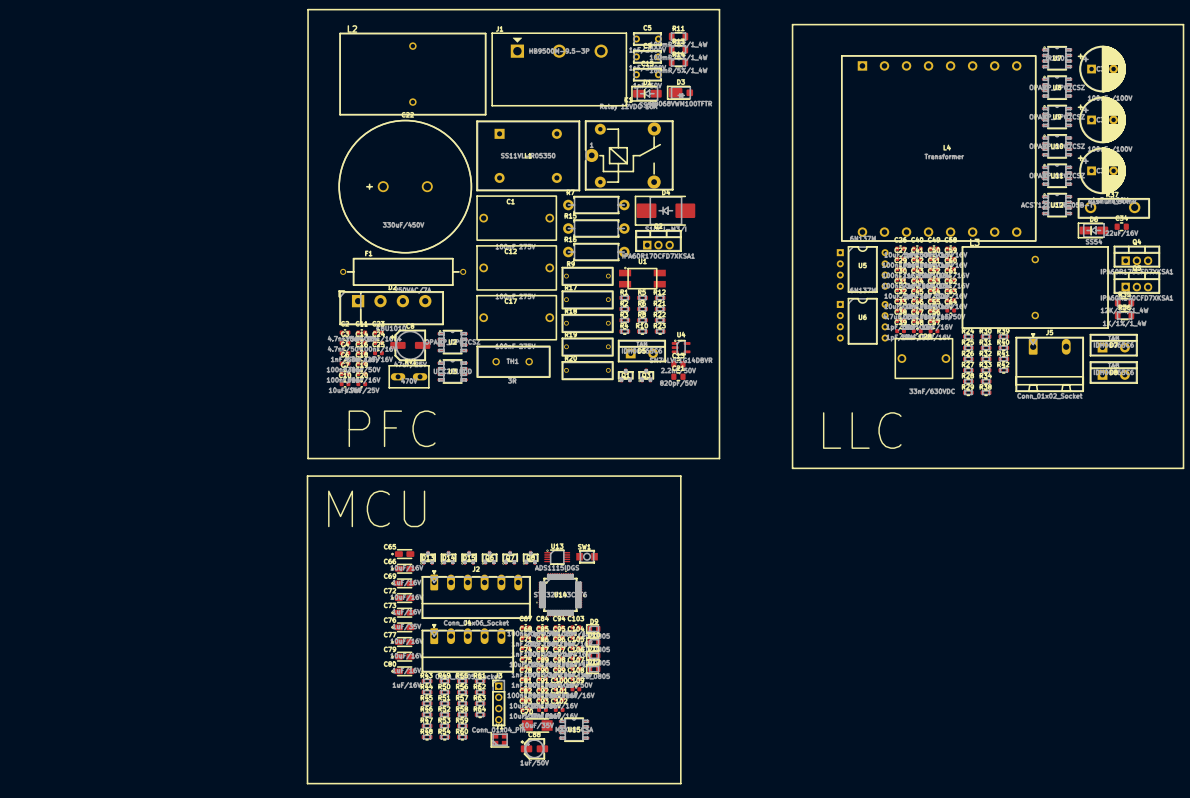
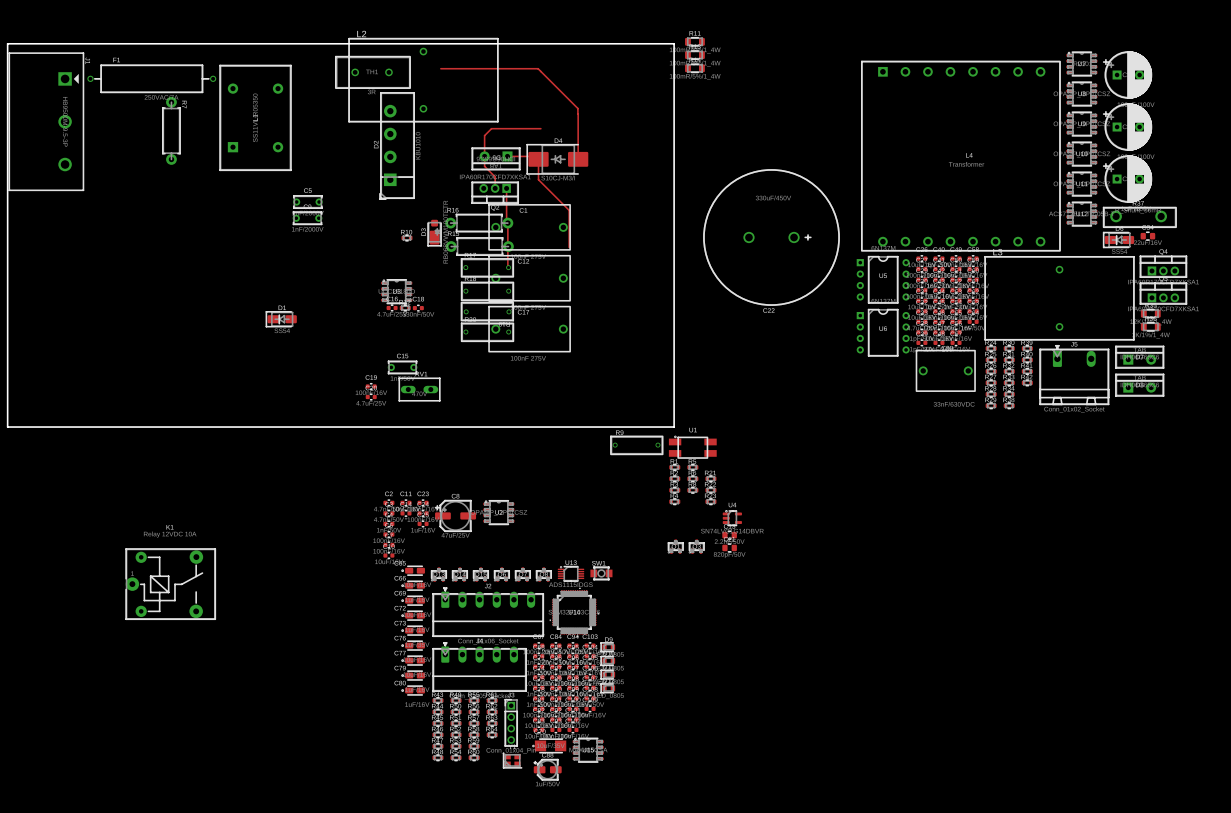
line: (308, 9) (719, 9) (719, 458) (308, 458) (308, 9) -> none
line: (792, 24) (1183, 24) (1183, 468) (792, 468) (792, 24) -> none
board edge: none -> (7, 43) (674, 43) (674, 427) (7, 427) (7, 43)
part position: (647, 39) -> (307, 202)
part position: (647, 56) -> (307, 218)
track: none -> (440, 68) (538, 68) (577, 108) (578, 159)
part rotation: 0° (559, 69) -> 90° clockwise (46, 121)
part position: (559, 69) -> (46, 121)
part position: (647, 74) -> (402, 367)
part rotation: 0° (680, 92) -> 90° counterclockwise (434, 232)
part position: (680, 92) -> (434, 232)
part position: (646, 93) -> (281, 319)
track: none -> (540, 128) (491, 128) (484, 135) (484, 166) (494, 176) (495, 188)
track: none -> (507, 156) (535, 156) (538, 159) (538, 179) (569, 210) (569, 247)
part rotation: 0° (528, 155) -> 90° counterclockwise (255, 117)
part position: (528, 155) -> (255, 117)
part position: (629, 155) -> (170, 584)
track: none -> (506, 188) (508, 267)
part rotation: 0° (405, 186) -> 180° (771, 237)
part position: (405, 186) -> (771, 237)
part rotation: 0° (596, 205) -> 90° clockwise (171, 130)
part position: (596, 205) -> (171, 130)
part position: (665, 210) -> (557, 159)
part position: (596, 228) -> (479, 246)
part rotation: 0° (658, 240) -> 180° (495, 192)
part position: (658, 240) -> (495, 192)
part position: (596, 252) -> (479, 223)
part position: (403, 271) -> (151, 78)
part position: (587, 276) -> (636, 445)
part position: (642, 278) -> (692, 447)
part position: (624, 297) -> (674, 467)
part position: (642, 297) -> (692, 467)
part position: (660, 297) -> (405, 308)
part position: (587, 299) -> (487, 267)
part rotation: 0° (391, 307) -> 90° counterclockwise (397, 146)
part position: (391, 307) -> (397, 146)
part position: (624, 309) -> (674, 478)
part position: (642, 309) -> (692, 478)
part position: (660, 309) -> (710, 478)
part position: (624, 320) -> (674, 490)
part position: (642, 320) -> (692, 490)
part position: (660, 320) -> (710, 490)
part position: (587, 323) -> (487, 291)
part position: (624, 331) -> (674, 501)
part position: (642, 331) -> (406, 238)
part position: (660, 331) -> (710, 501)
part position: (345, 332) -> (388, 502)
part position: (361, 332) -> (405, 502)
part position: (378, 332) -> (423, 502)
part position: (345, 342) -> (388, 513)
part position: (361, 342) -> (405, 513)
part position: (378, 342) -> (423, 513)
part position: (452, 342) -> (498, 512)
part position: (410, 345) -> (455, 515)
part rotation: 0° (587, 347) -> 180° (487, 311)
part position: (587, 347) -> (487, 311)
part position: (681, 347) -> (732, 518)
part rotation: 0° (641, 351) -> 180° (496, 158)
part position: (641, 351) -> (496, 158)
part position: (345, 353) -> (388, 523)
part position: (361, 353) -> (392, 307)
part position: (378, 353) -> (423, 523)
part position: (513, 361) -> (372, 72)
part position: (345, 363) -> (388, 534)
part position: (361, 363) -> (418, 308)
part position: (678, 364) -> (729, 535)
part position: (587, 370) -> (487, 332)
part position: (452, 371) -> (396, 291)
part position: (345, 373) -> (388, 545)
part position: (625, 375) -> (675, 546)
part position: (646, 375) -> (696, 546)
part position: (678, 376) -> (729, 547)
part position: (345, 384) -> (388, 555)
text: PFC (392, 428) -> none
text: LLC (862, 430) -> none
line: (307, 476) (680, 476) (680, 783) (307, 783) (307, 476) -> none
text: MCU (376, 508) -> none

